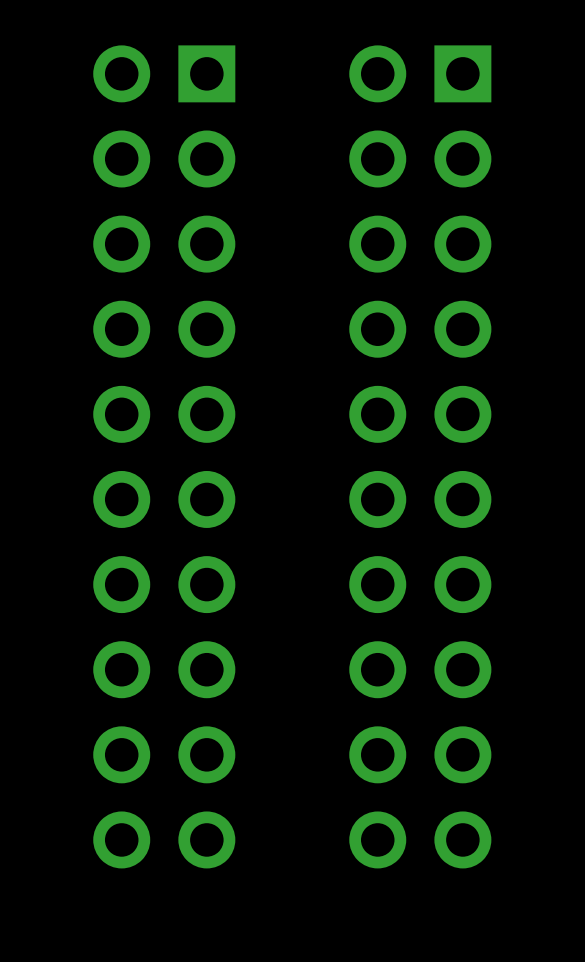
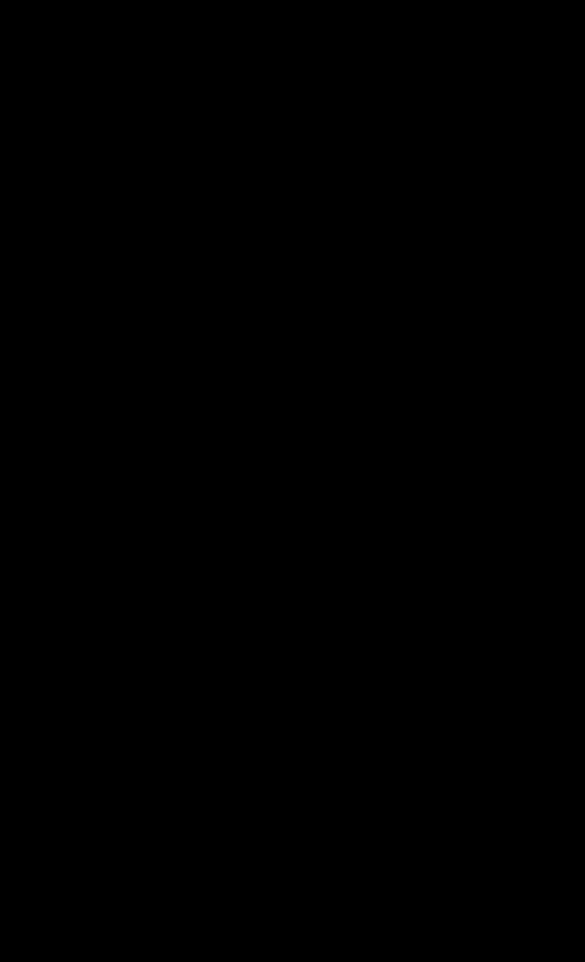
part: (164, 456) -> none
part: (420, 456) -> none

